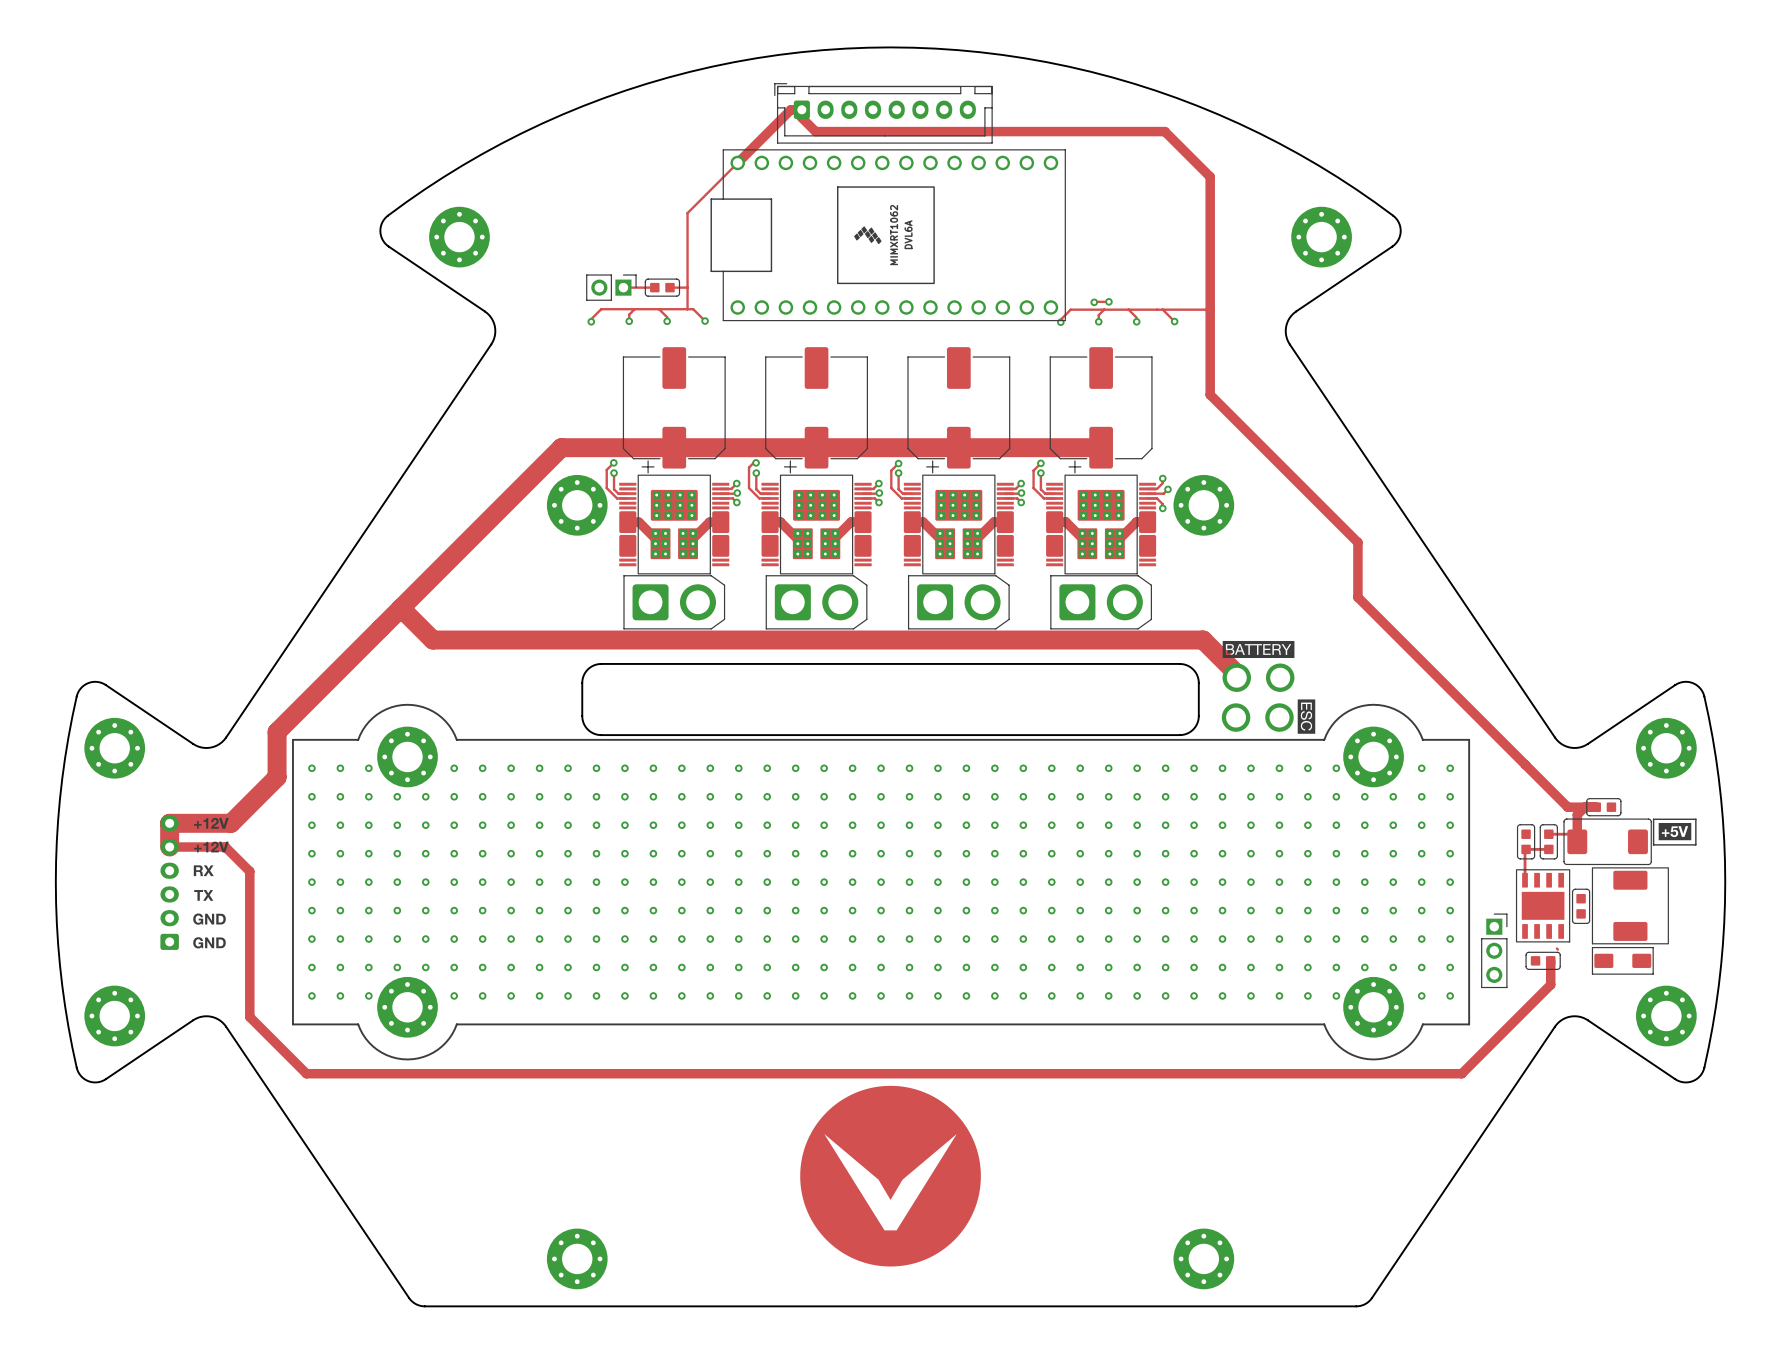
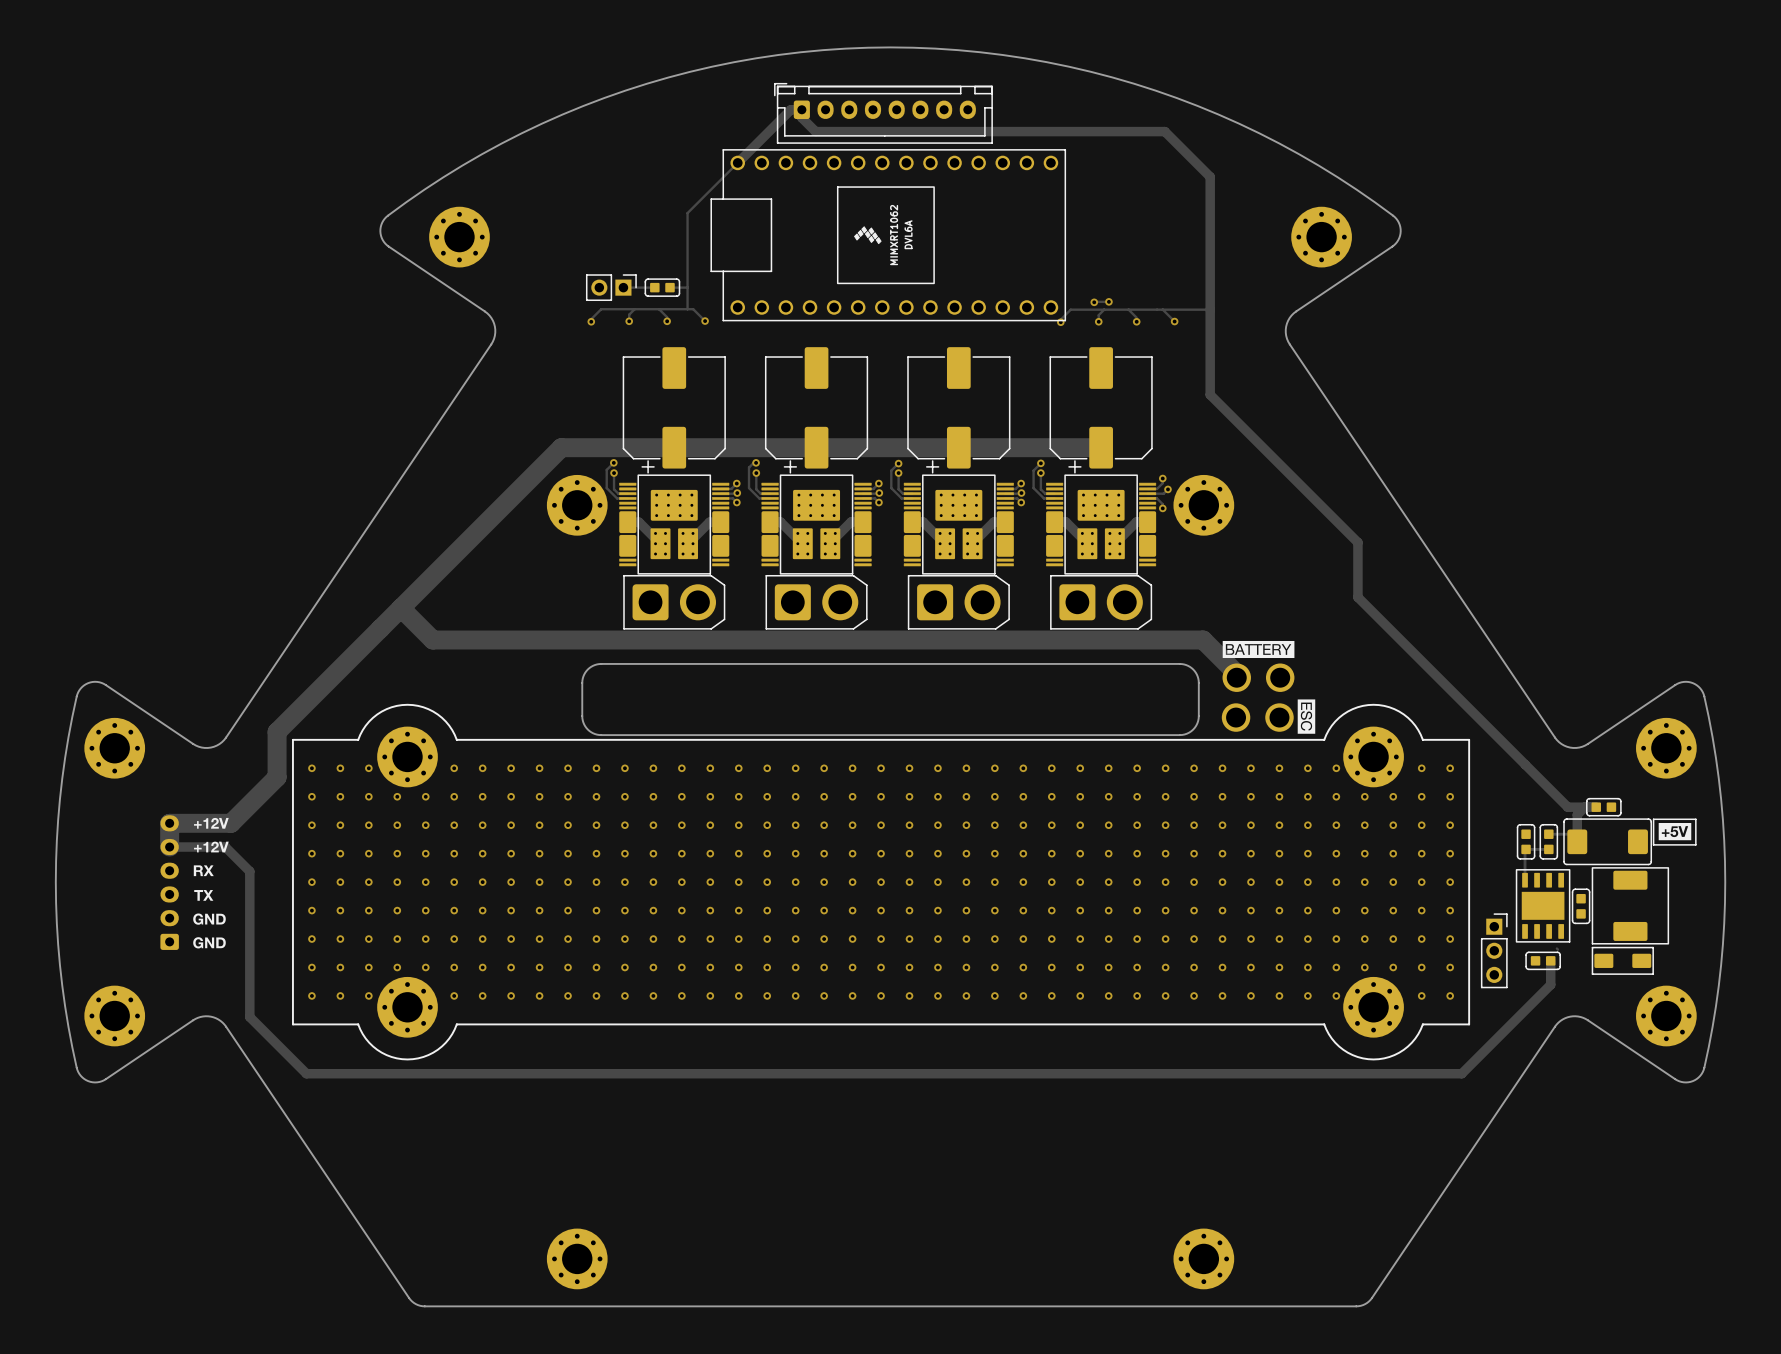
part: (890, 1176) -> none

